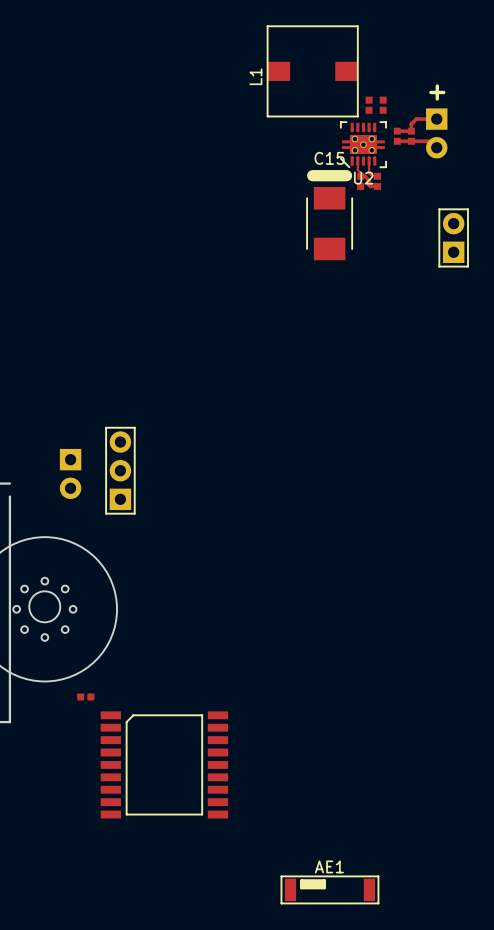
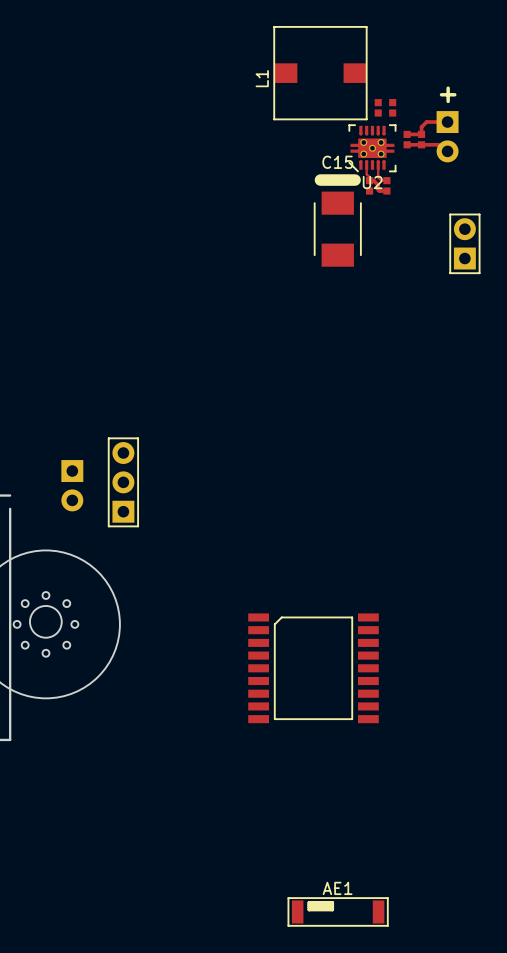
part: (85, 696) -> none
part position: (164, 764) -> (313, 668)

